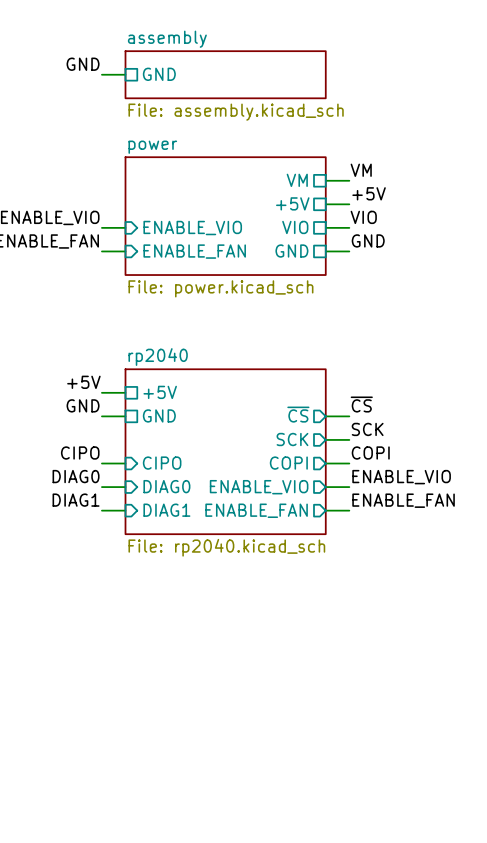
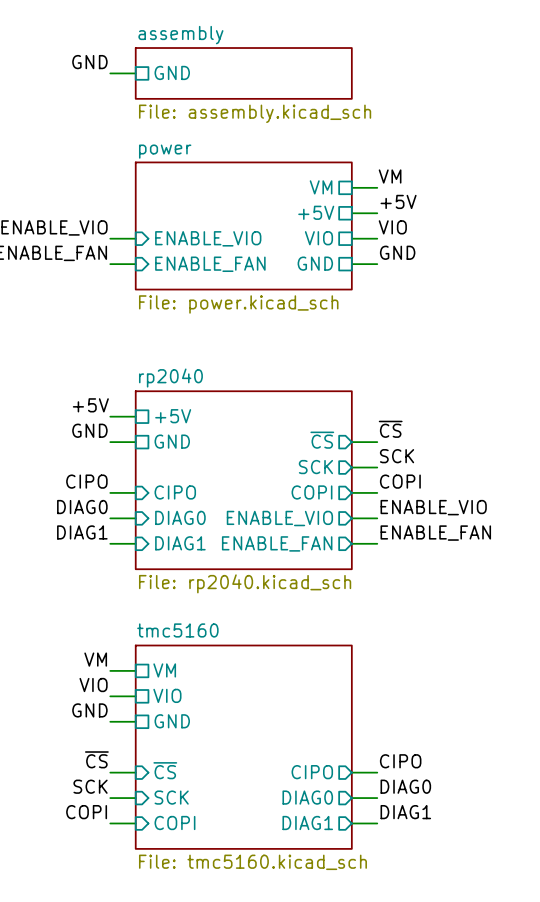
label: none -> VM (95, 659)
wire: none -> (110, 670) (135, 670)
sheet pin: none -> VM (164, 670)
label: none -> VIO (93, 685)
sheet pin: none -> VIO (167, 695)
wire: none -> (110, 696) (135, 696)
label: none -> GND (89, 710)
wire: none -> (110, 721) (135, 721)
sheet pin: none -> GND (172, 721)
sheet tmc5160: none -> File: tmc5160.kicad_sch (243, 747)
label: none -> ~{CS} (96, 759)
label: none -> CIPO (400, 761)
sheet pin: none -> ~{CS} (165, 770)
wire: none -> (110, 772) (135, 772)
sheet pin: none -> CIPO (312, 772)
wire: none -> (351, 772) (377, 772)
label: none -> SCK (90, 786)
label: none -> DIAG0 (405, 786)
sheet pin: none -> SCK (171, 797)
sheet pin: none -> DIAG0 (307, 797)
wire: none -> (110, 798) (135, 798)
wire: none -> (351, 798) (377, 798)
label: none -> COPI (86, 812)
label: none -> DIAG1 (405, 812)
wire: none -> (110, 823) (135, 823)
sheet pin: none -> COPI (174, 823)
sheet pin: none -> DIAG1 (307, 823)
wire: none -> (351, 823) (377, 823)

